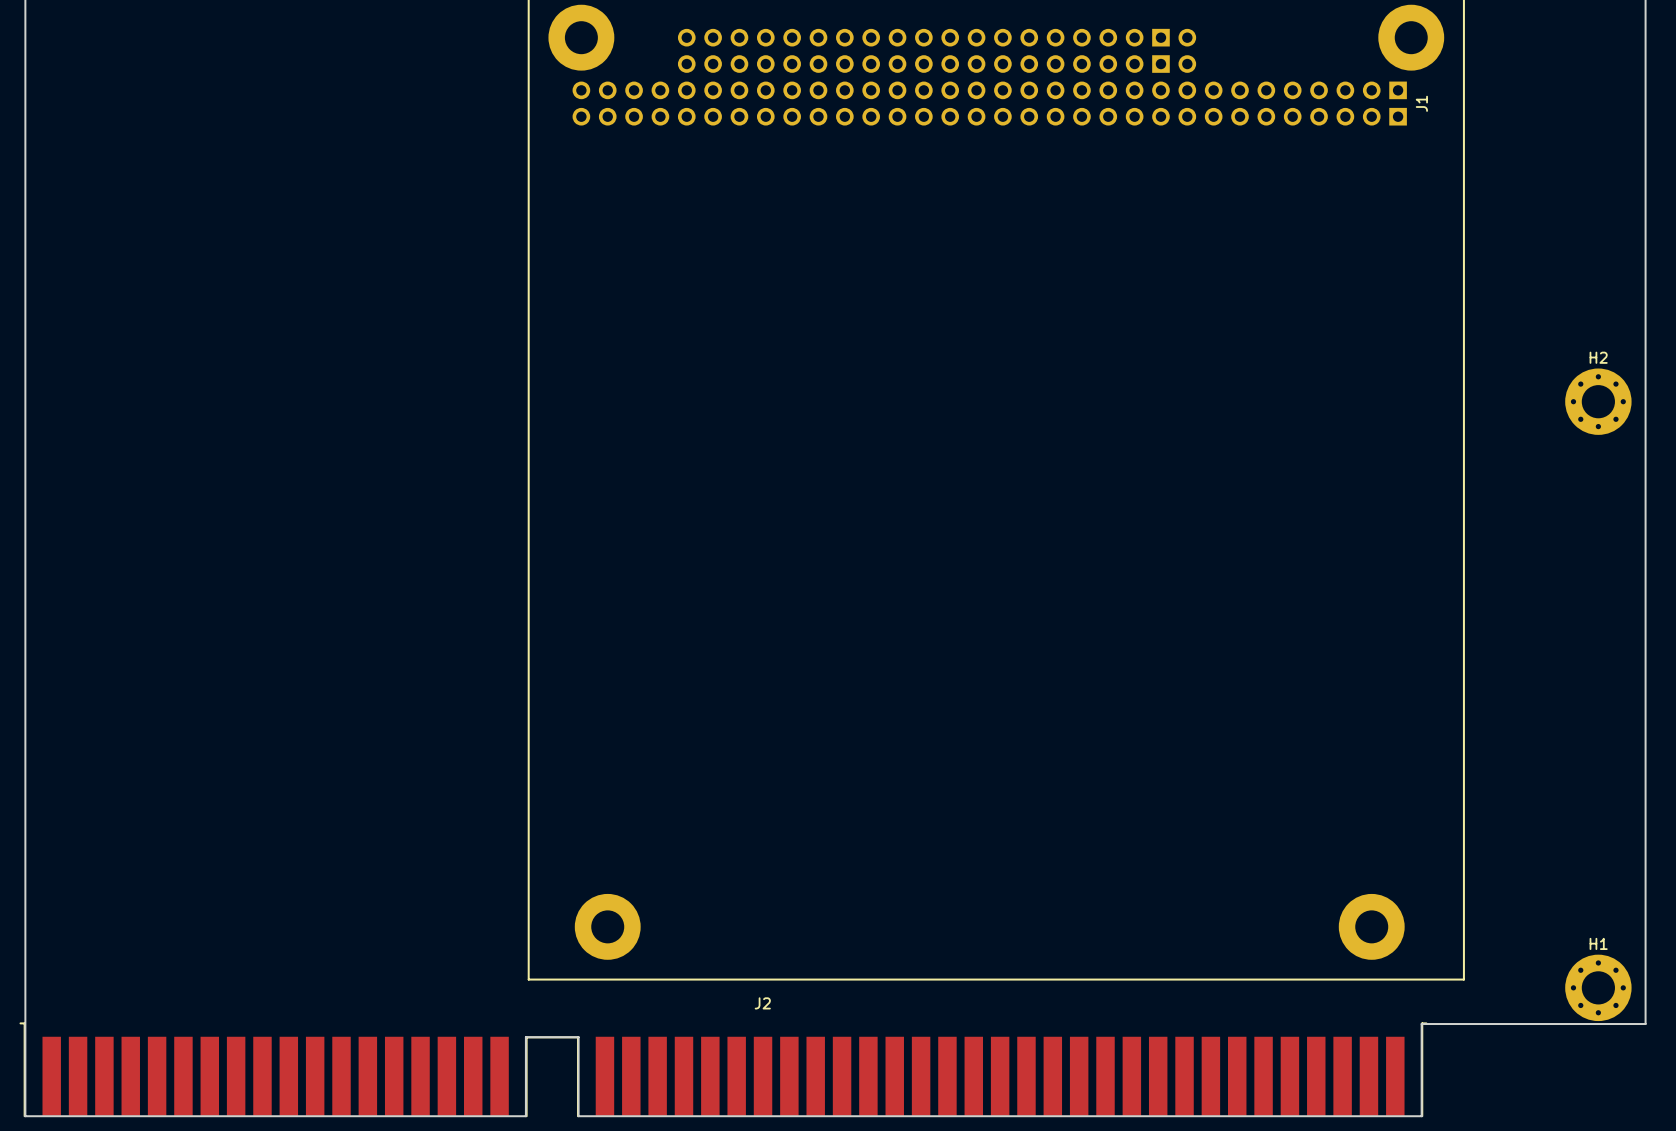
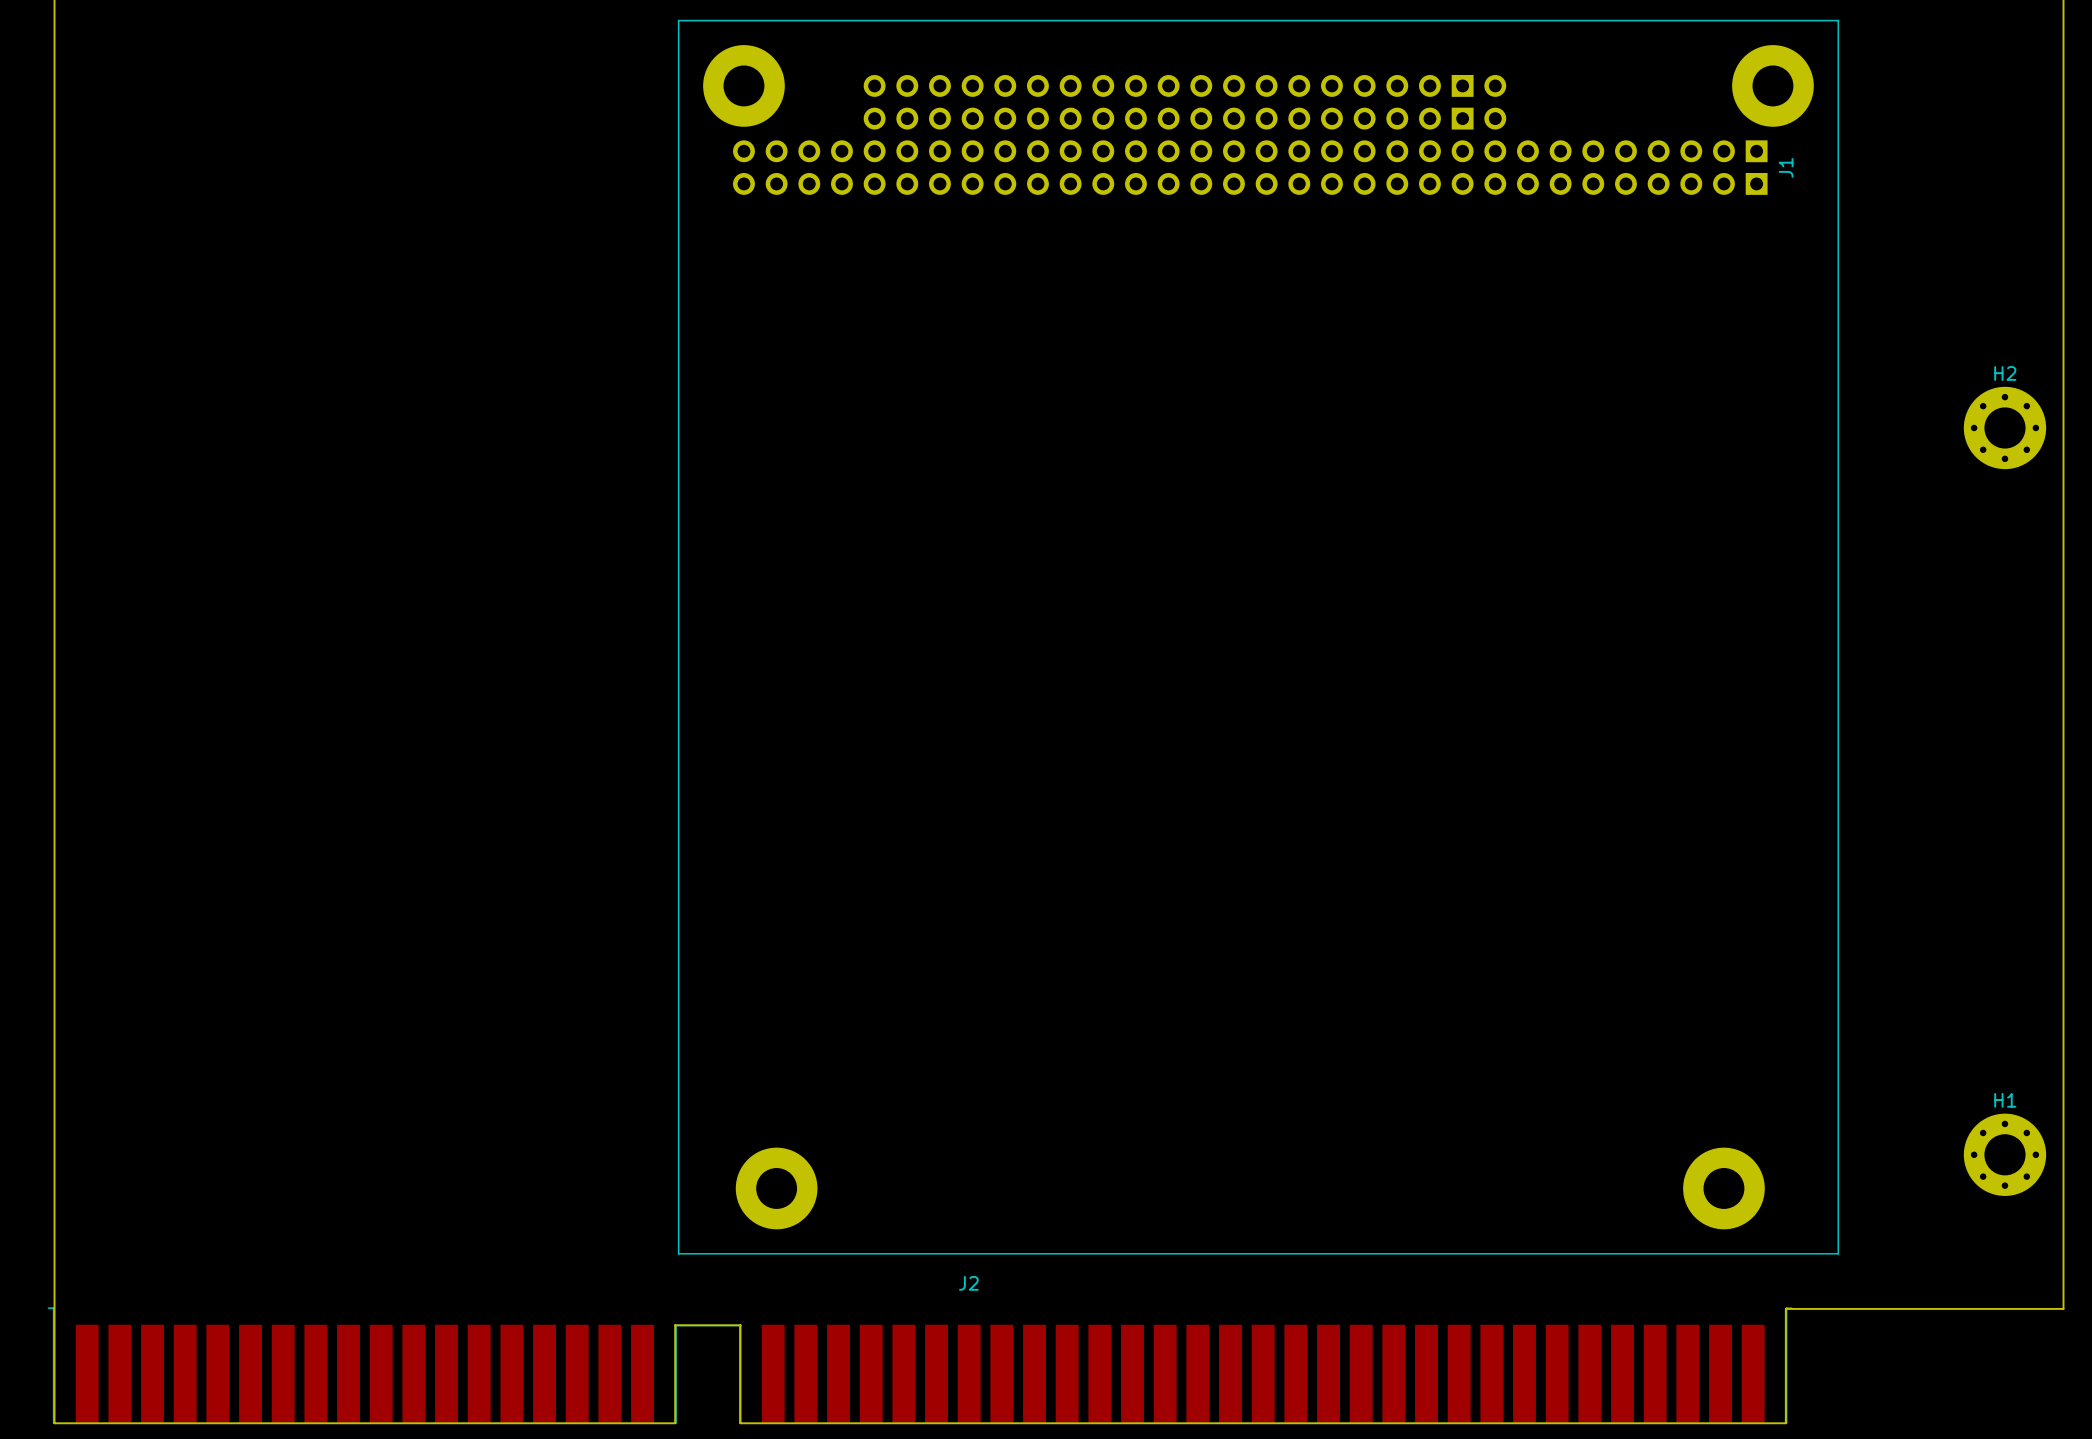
H2 position: (1598, 401) -> (2004, 427)
H1 position: (1598, 987) -> (2004, 1154)

